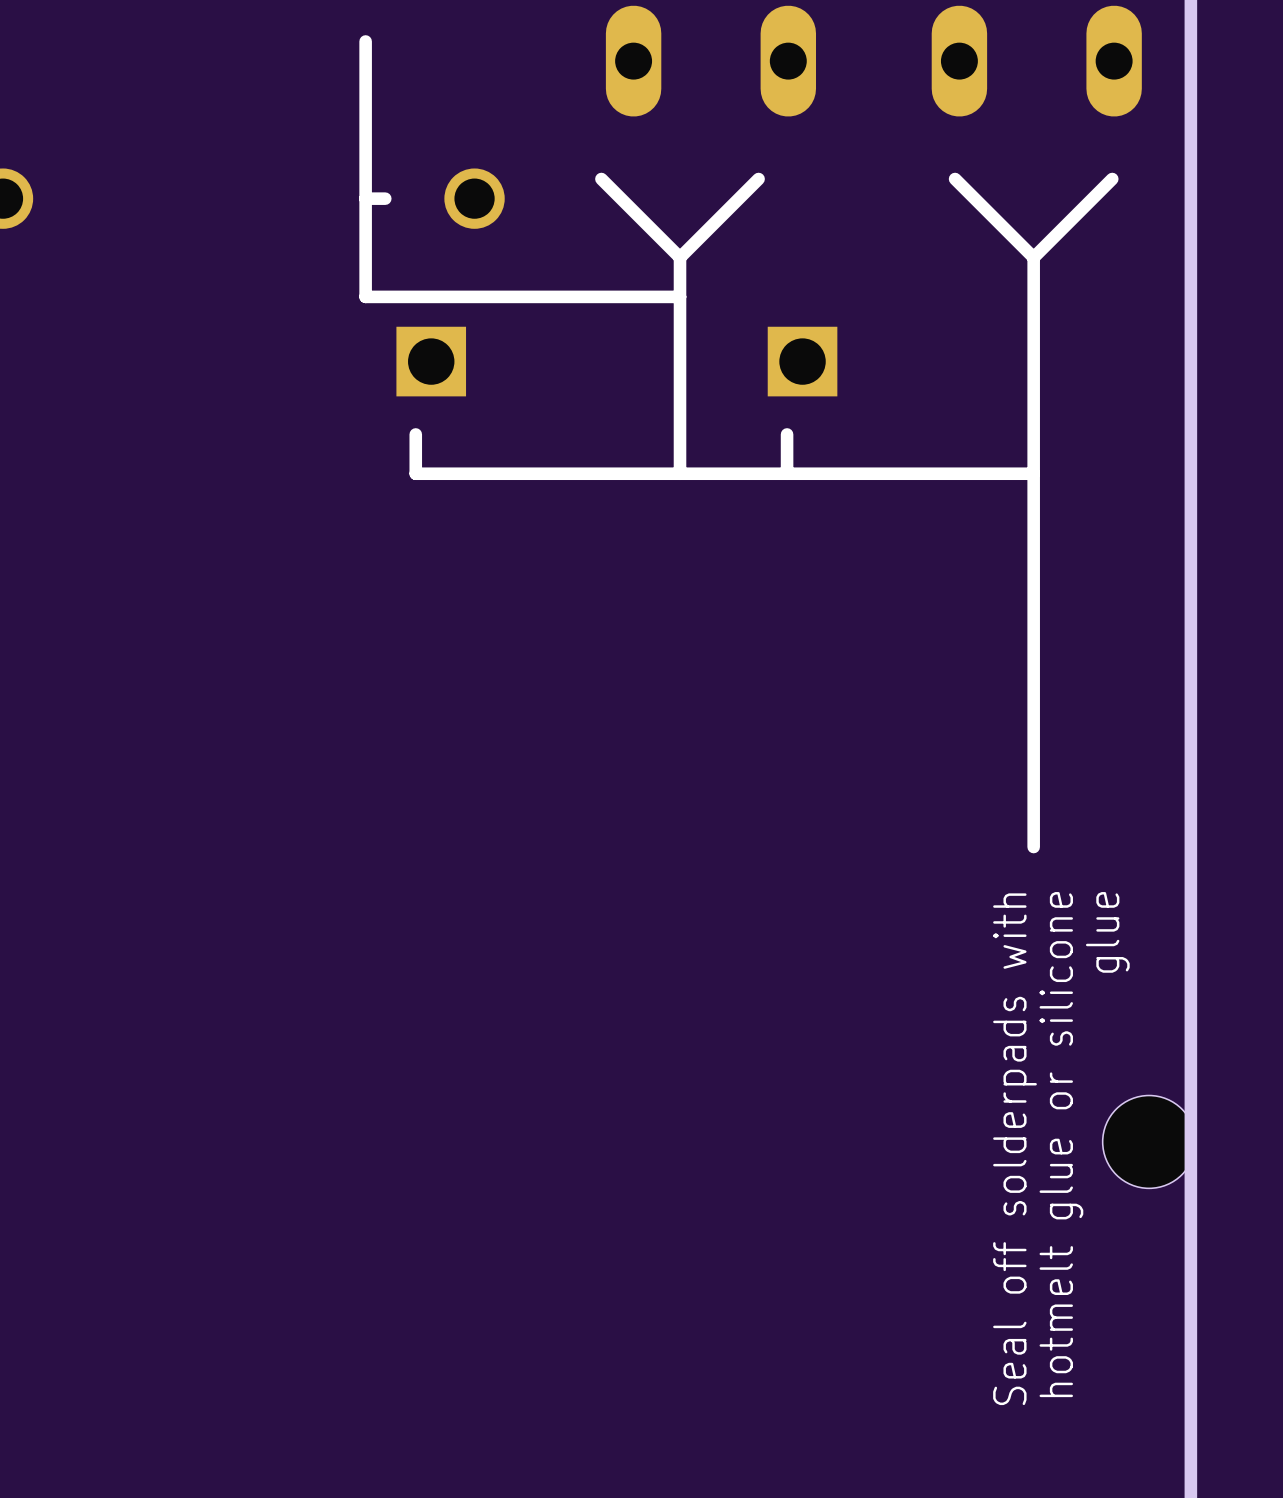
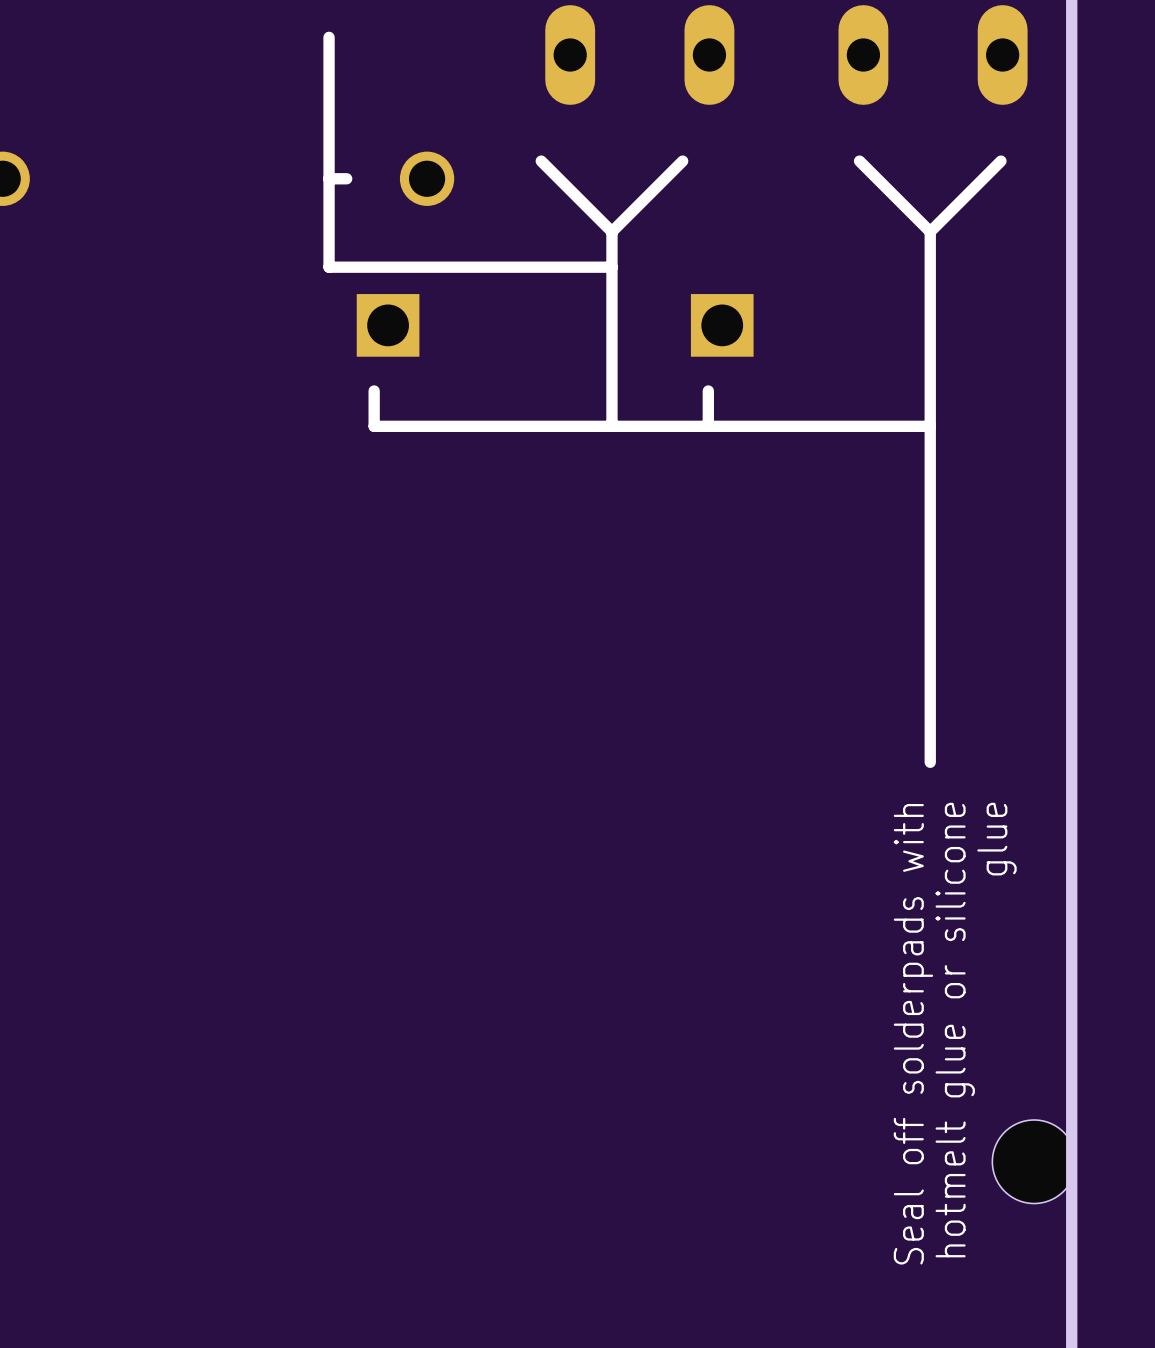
hole position: (1149, 1141) -> (1034, 1161)

